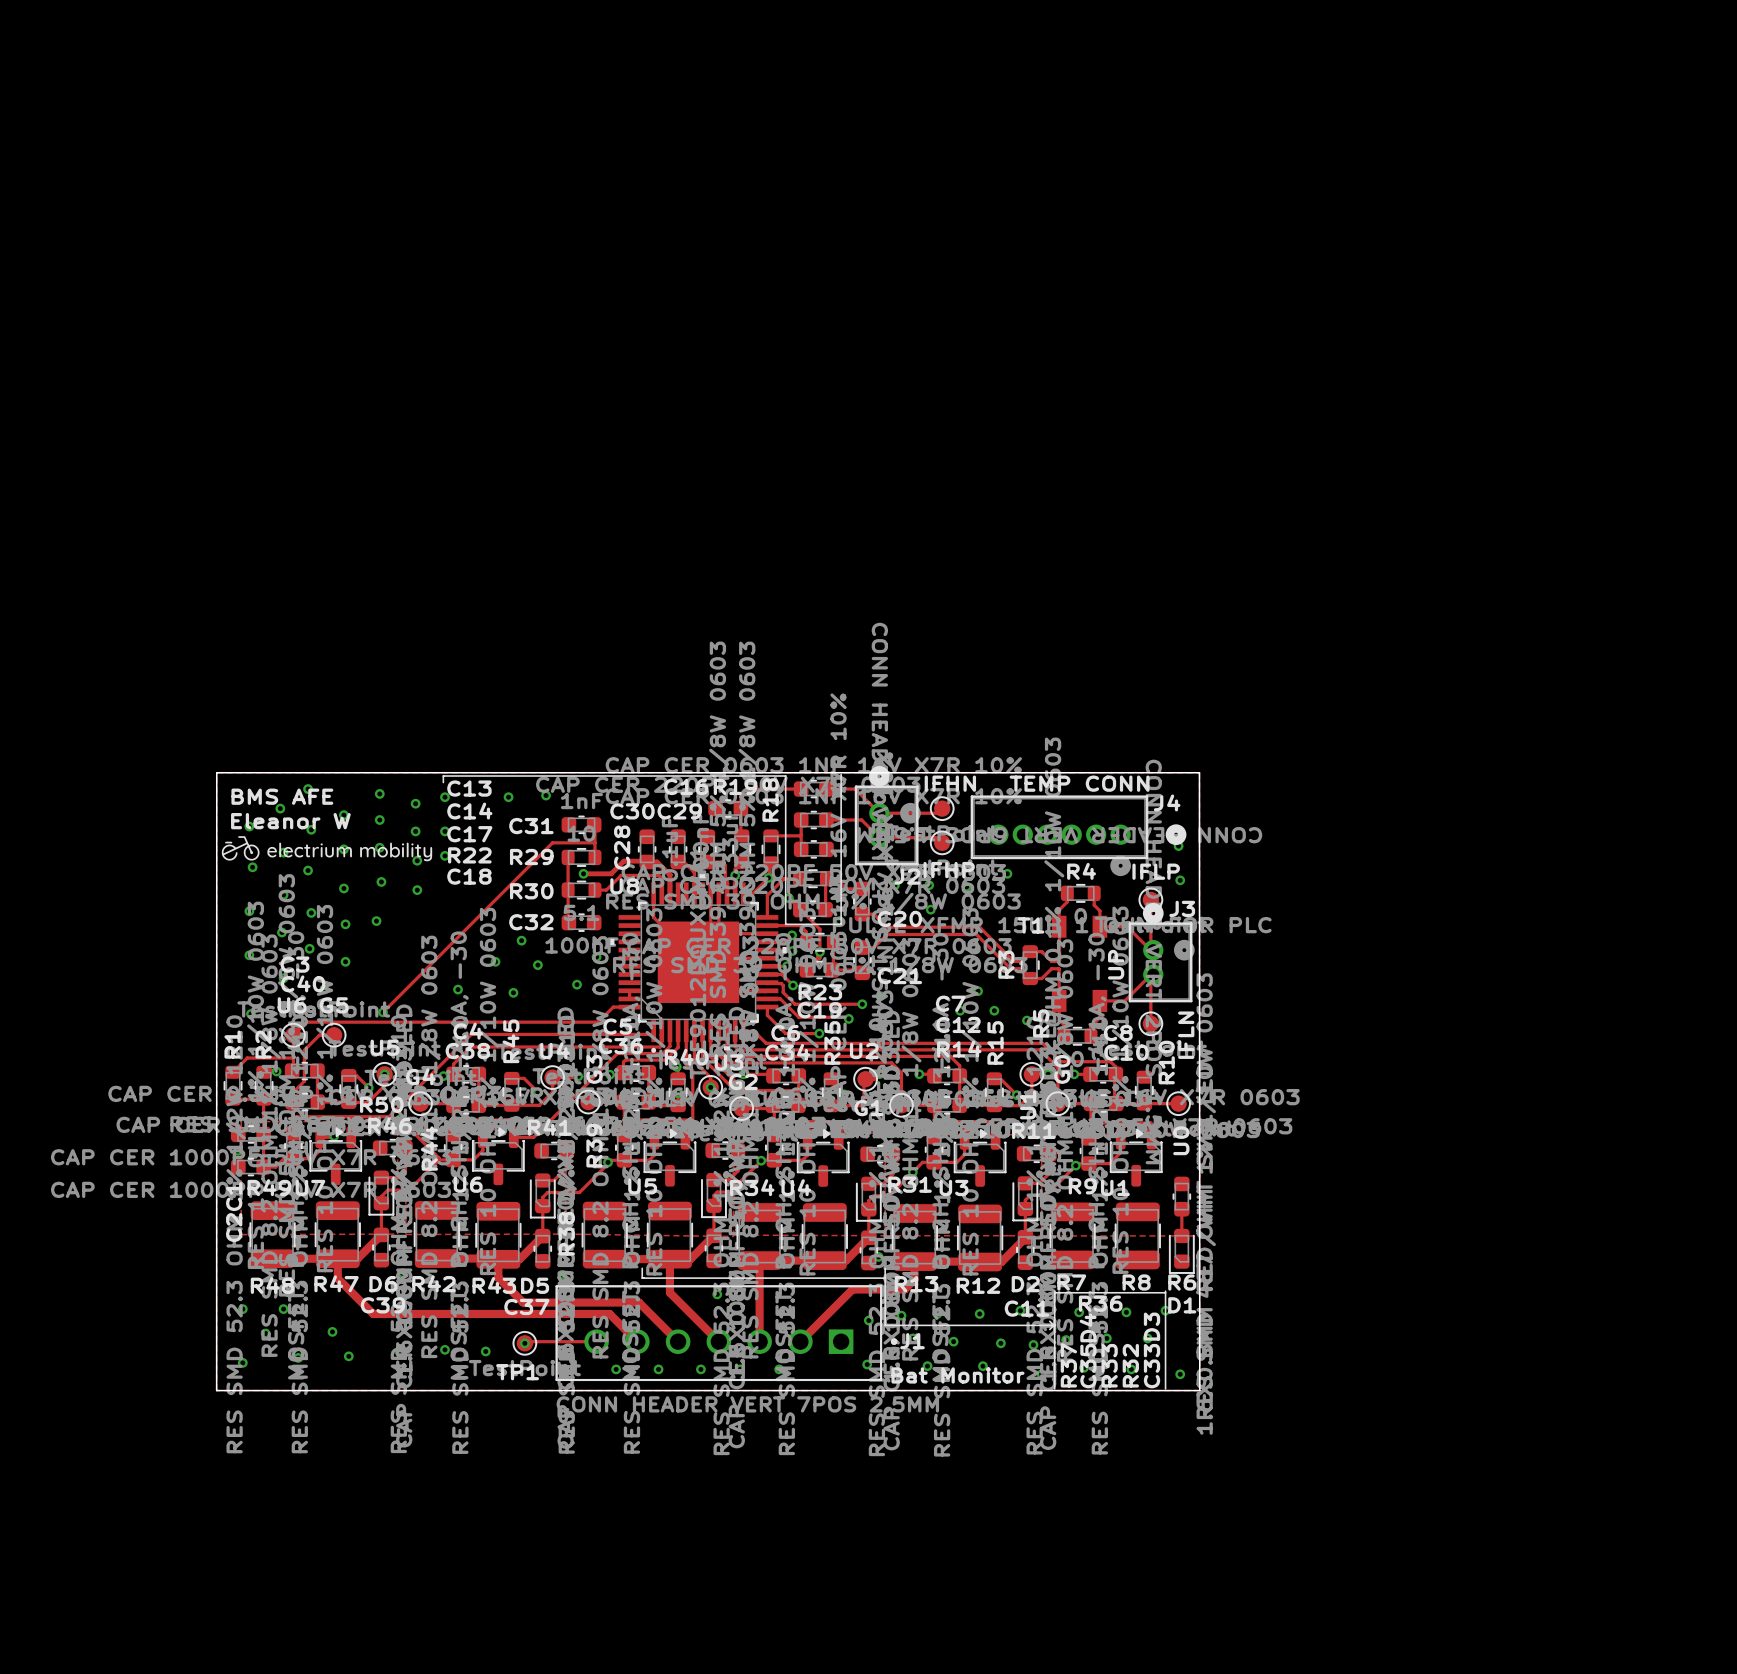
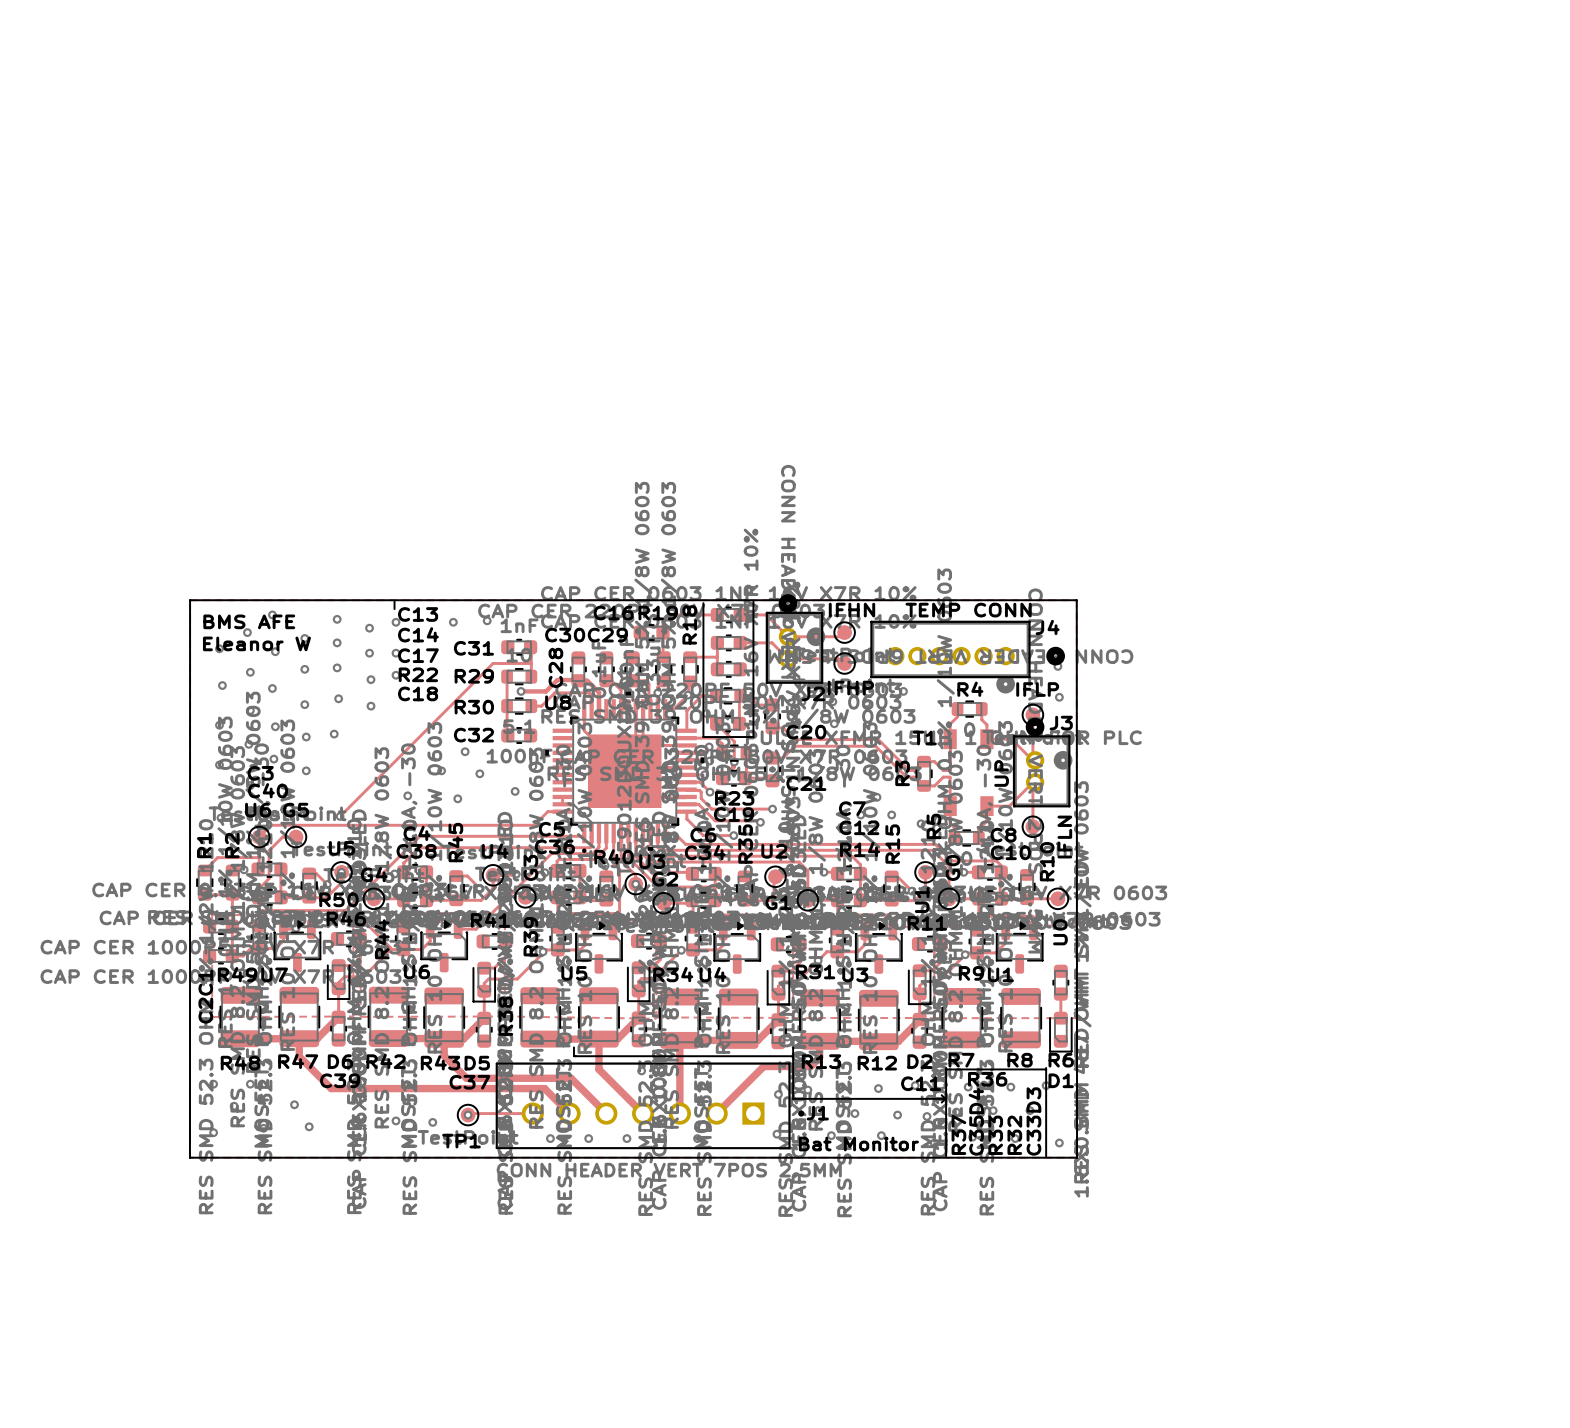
line: (443, 776) (785, 776) -> (394, 603) (394, 601)
drawing: [221, 836, 433, 862] -> none

